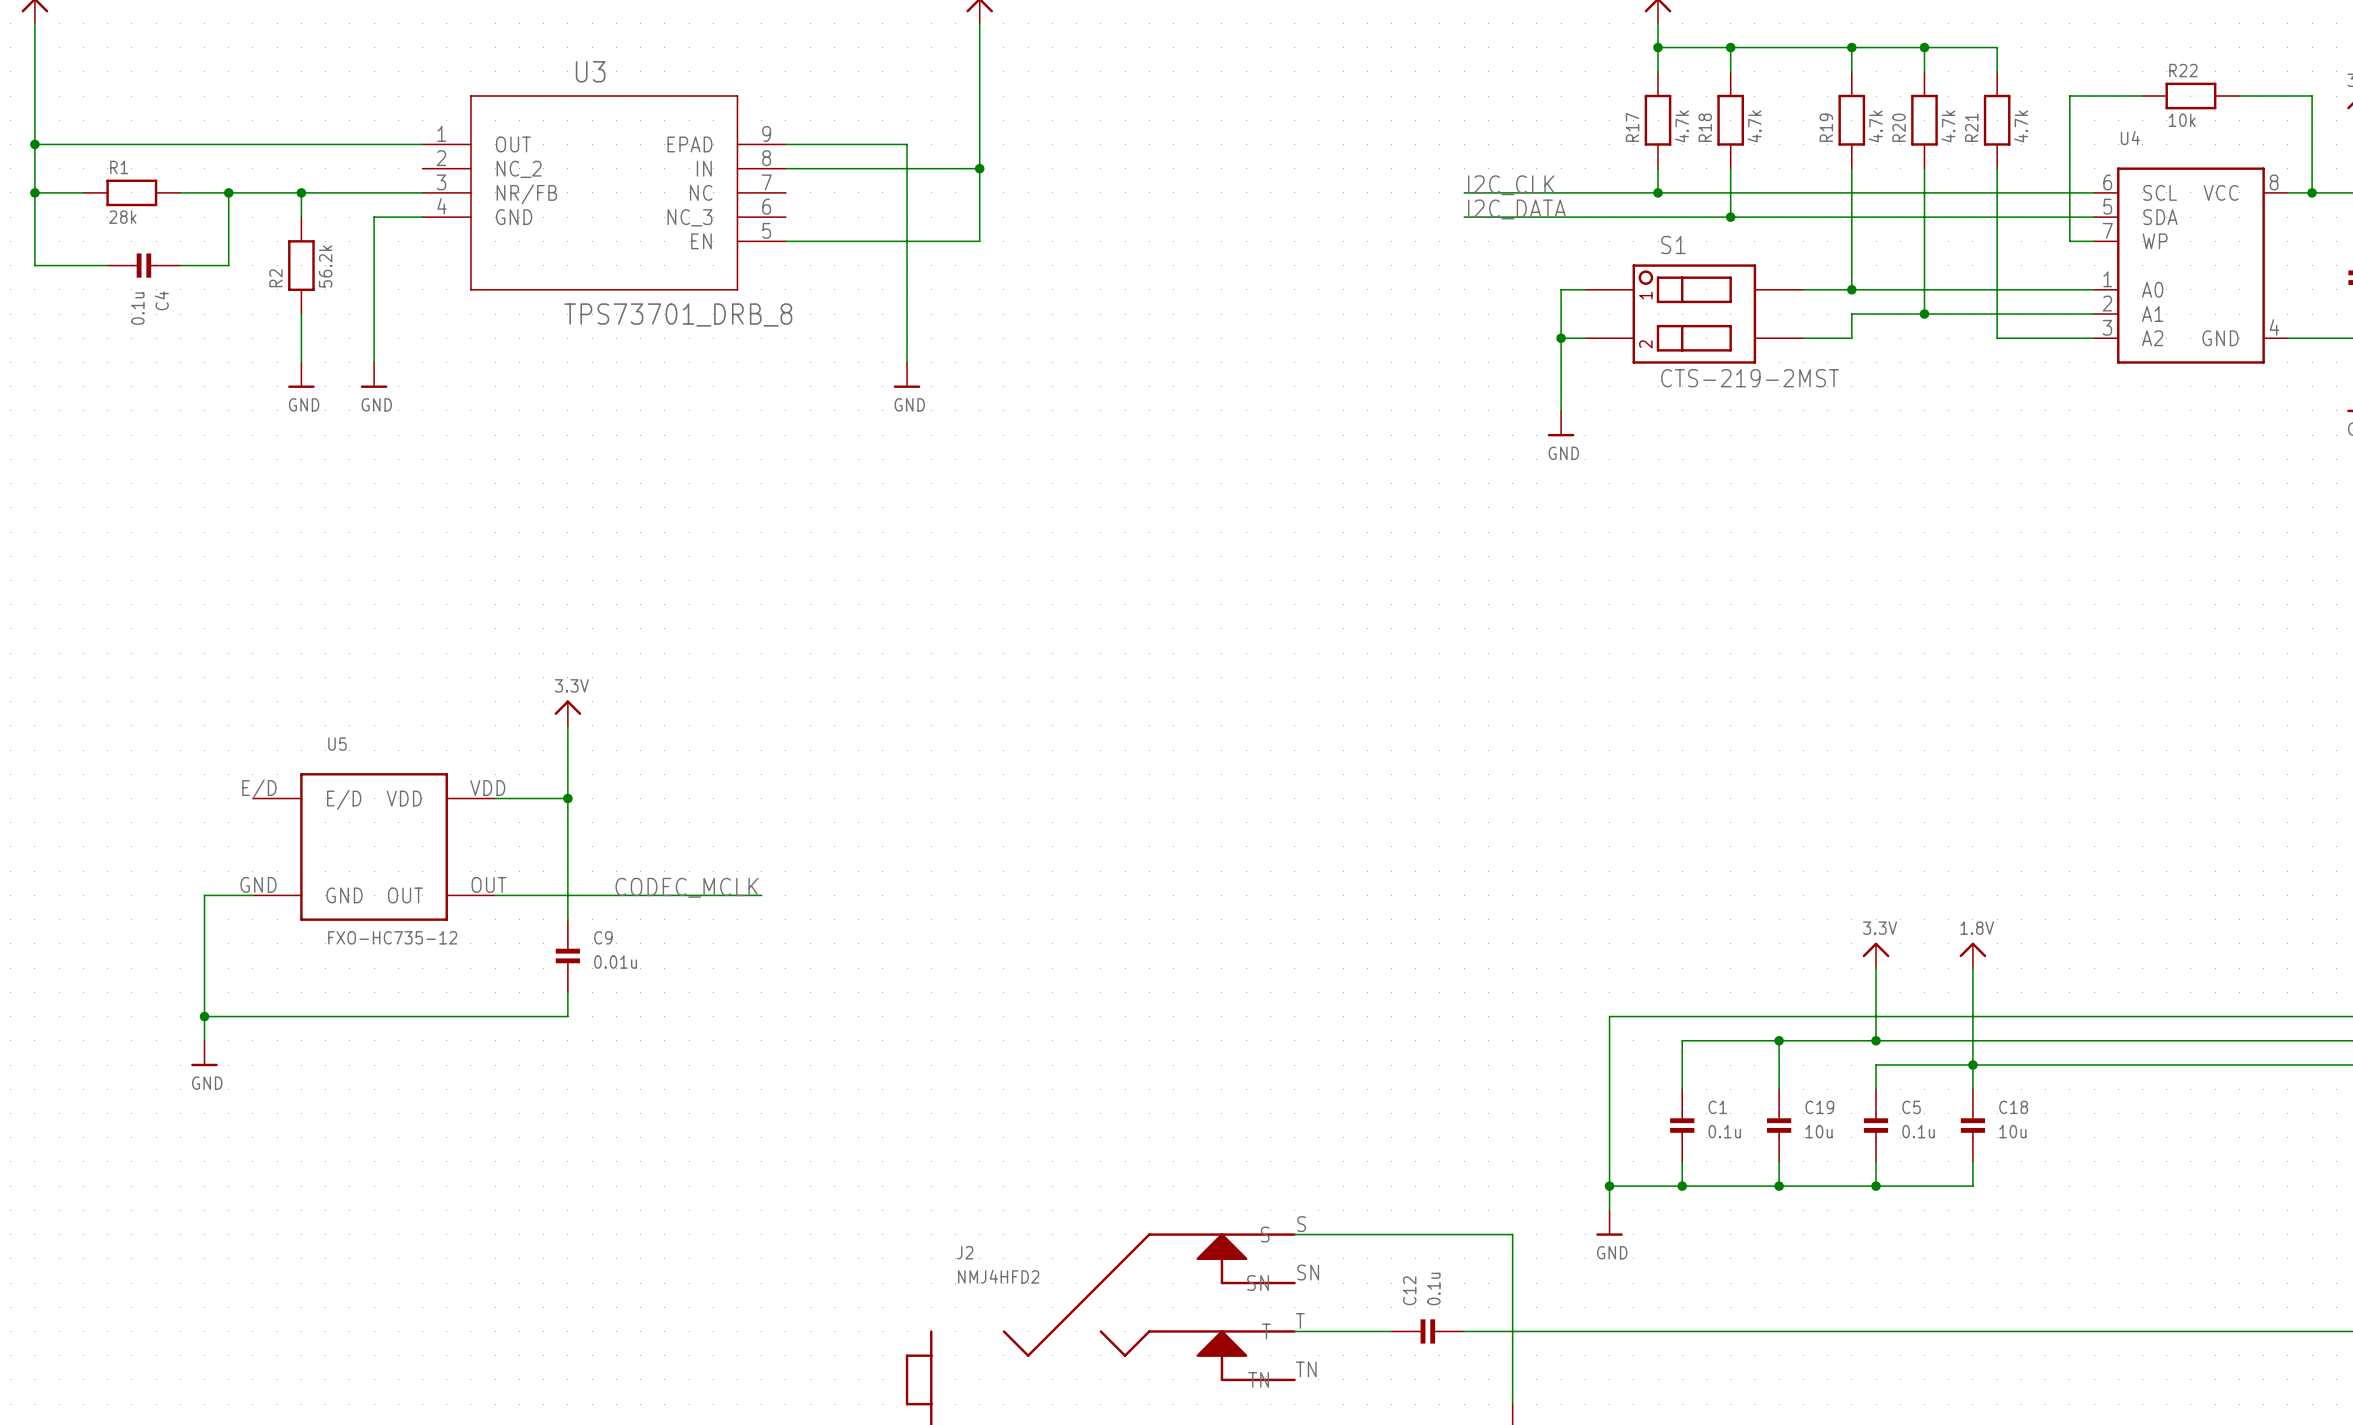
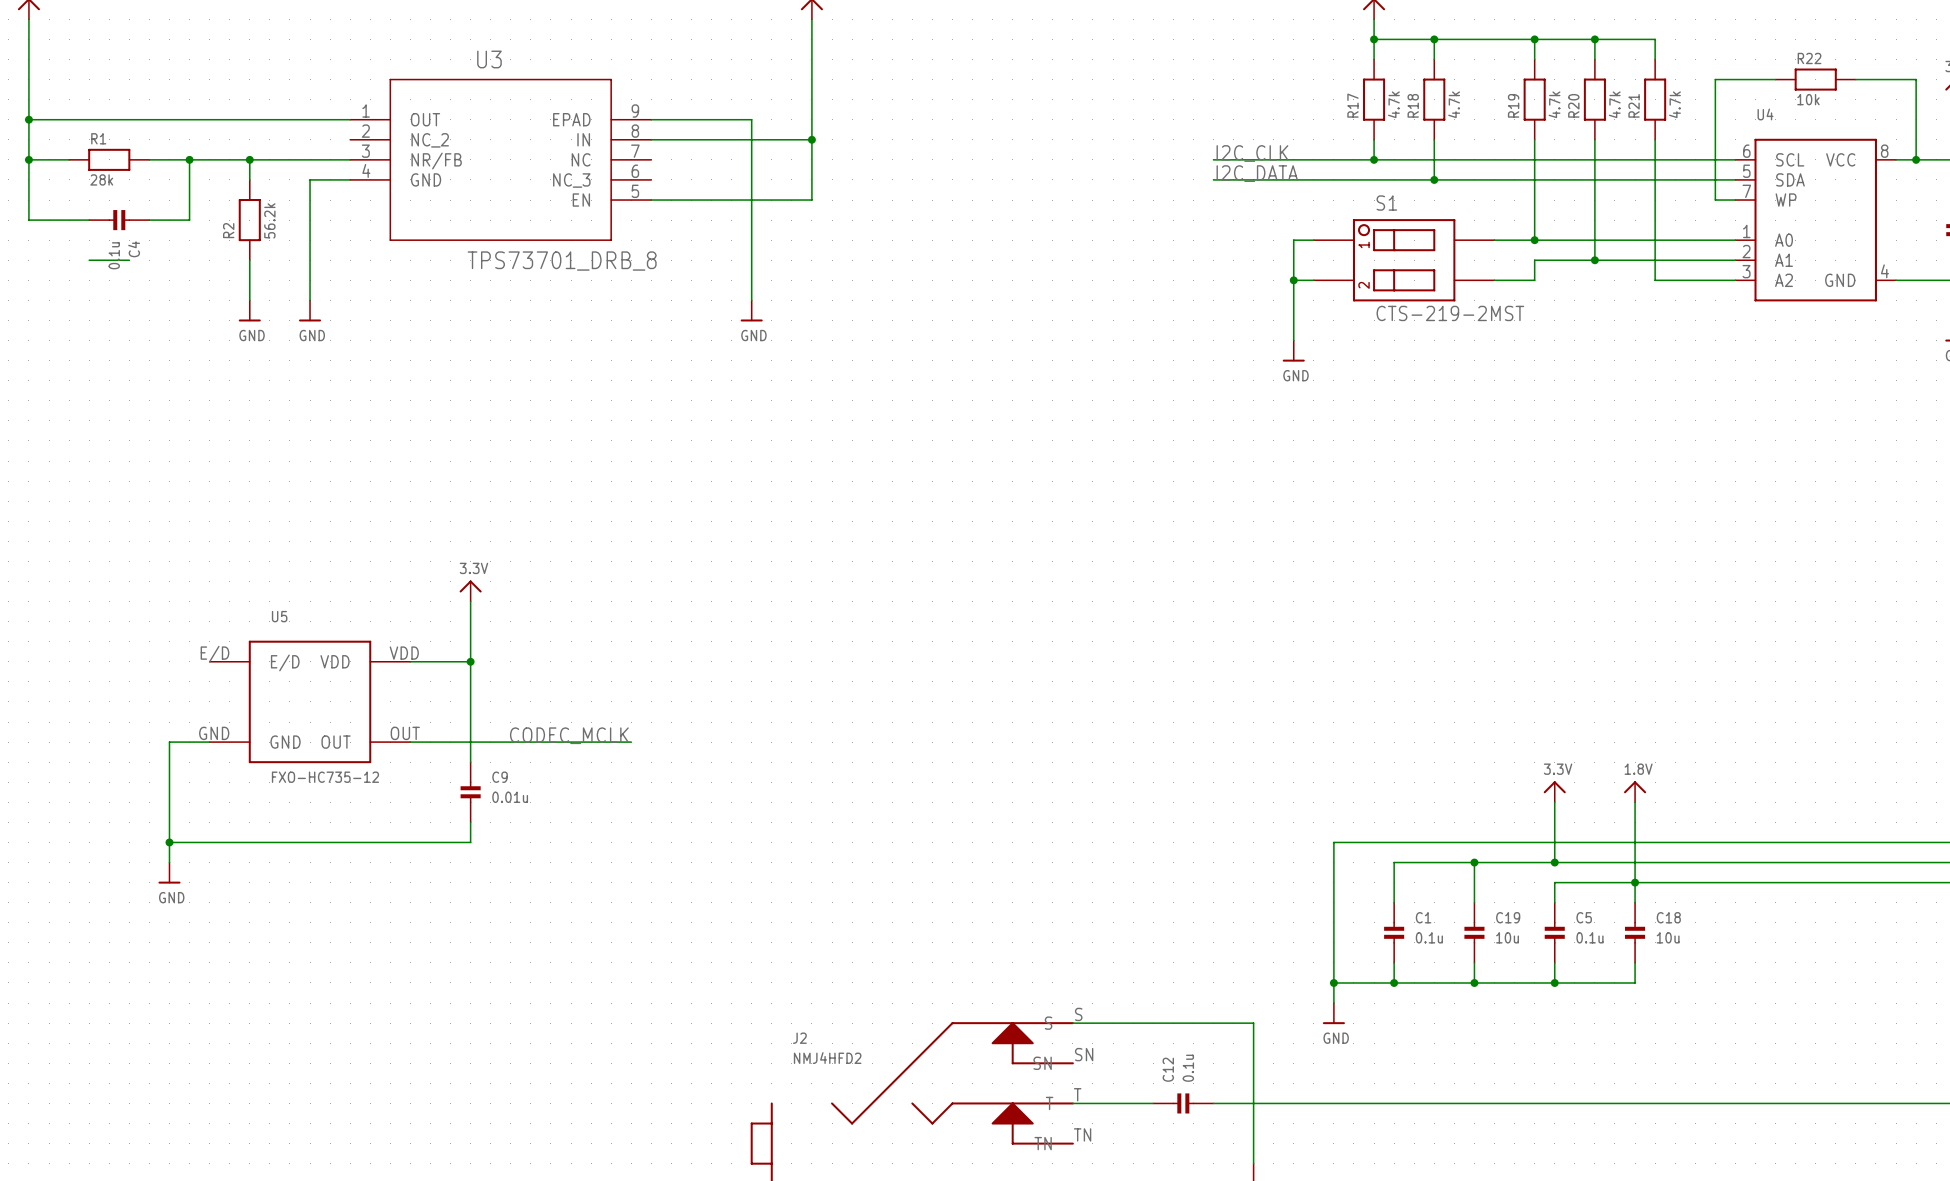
wire: none -> (89, 260) (129, 260)

